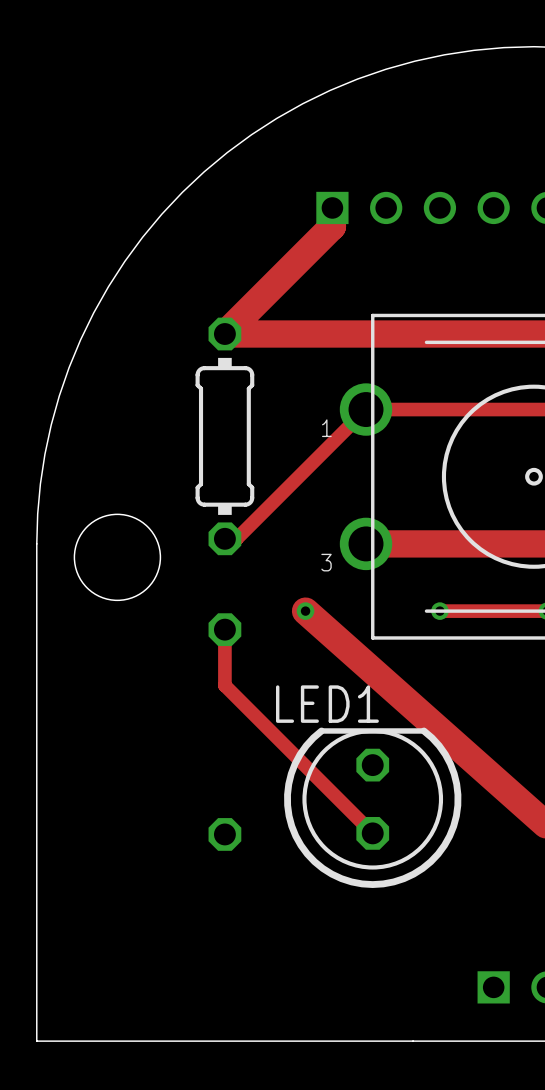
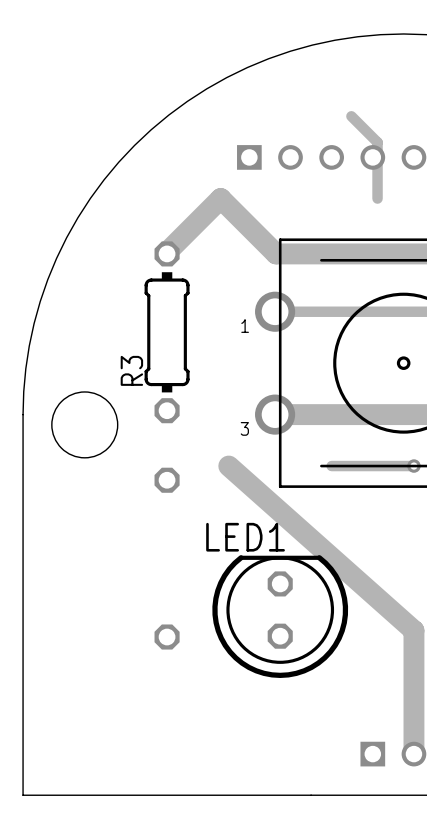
track: none -> (351, 116) (377, 142) (377, 198)
track: (332, 207) (332, 226) (224, 334) (367, 334) -> (167, 253) (220, 198) (276, 253)
track: (366, 409) (236, 538) (224, 538) -> none
R3 name: none -> R3 (131, 370)
via: (305, 611) -> none
via: (439, 611) -> none
track: (224, 629) (224, 685) (372, 833) -> none

